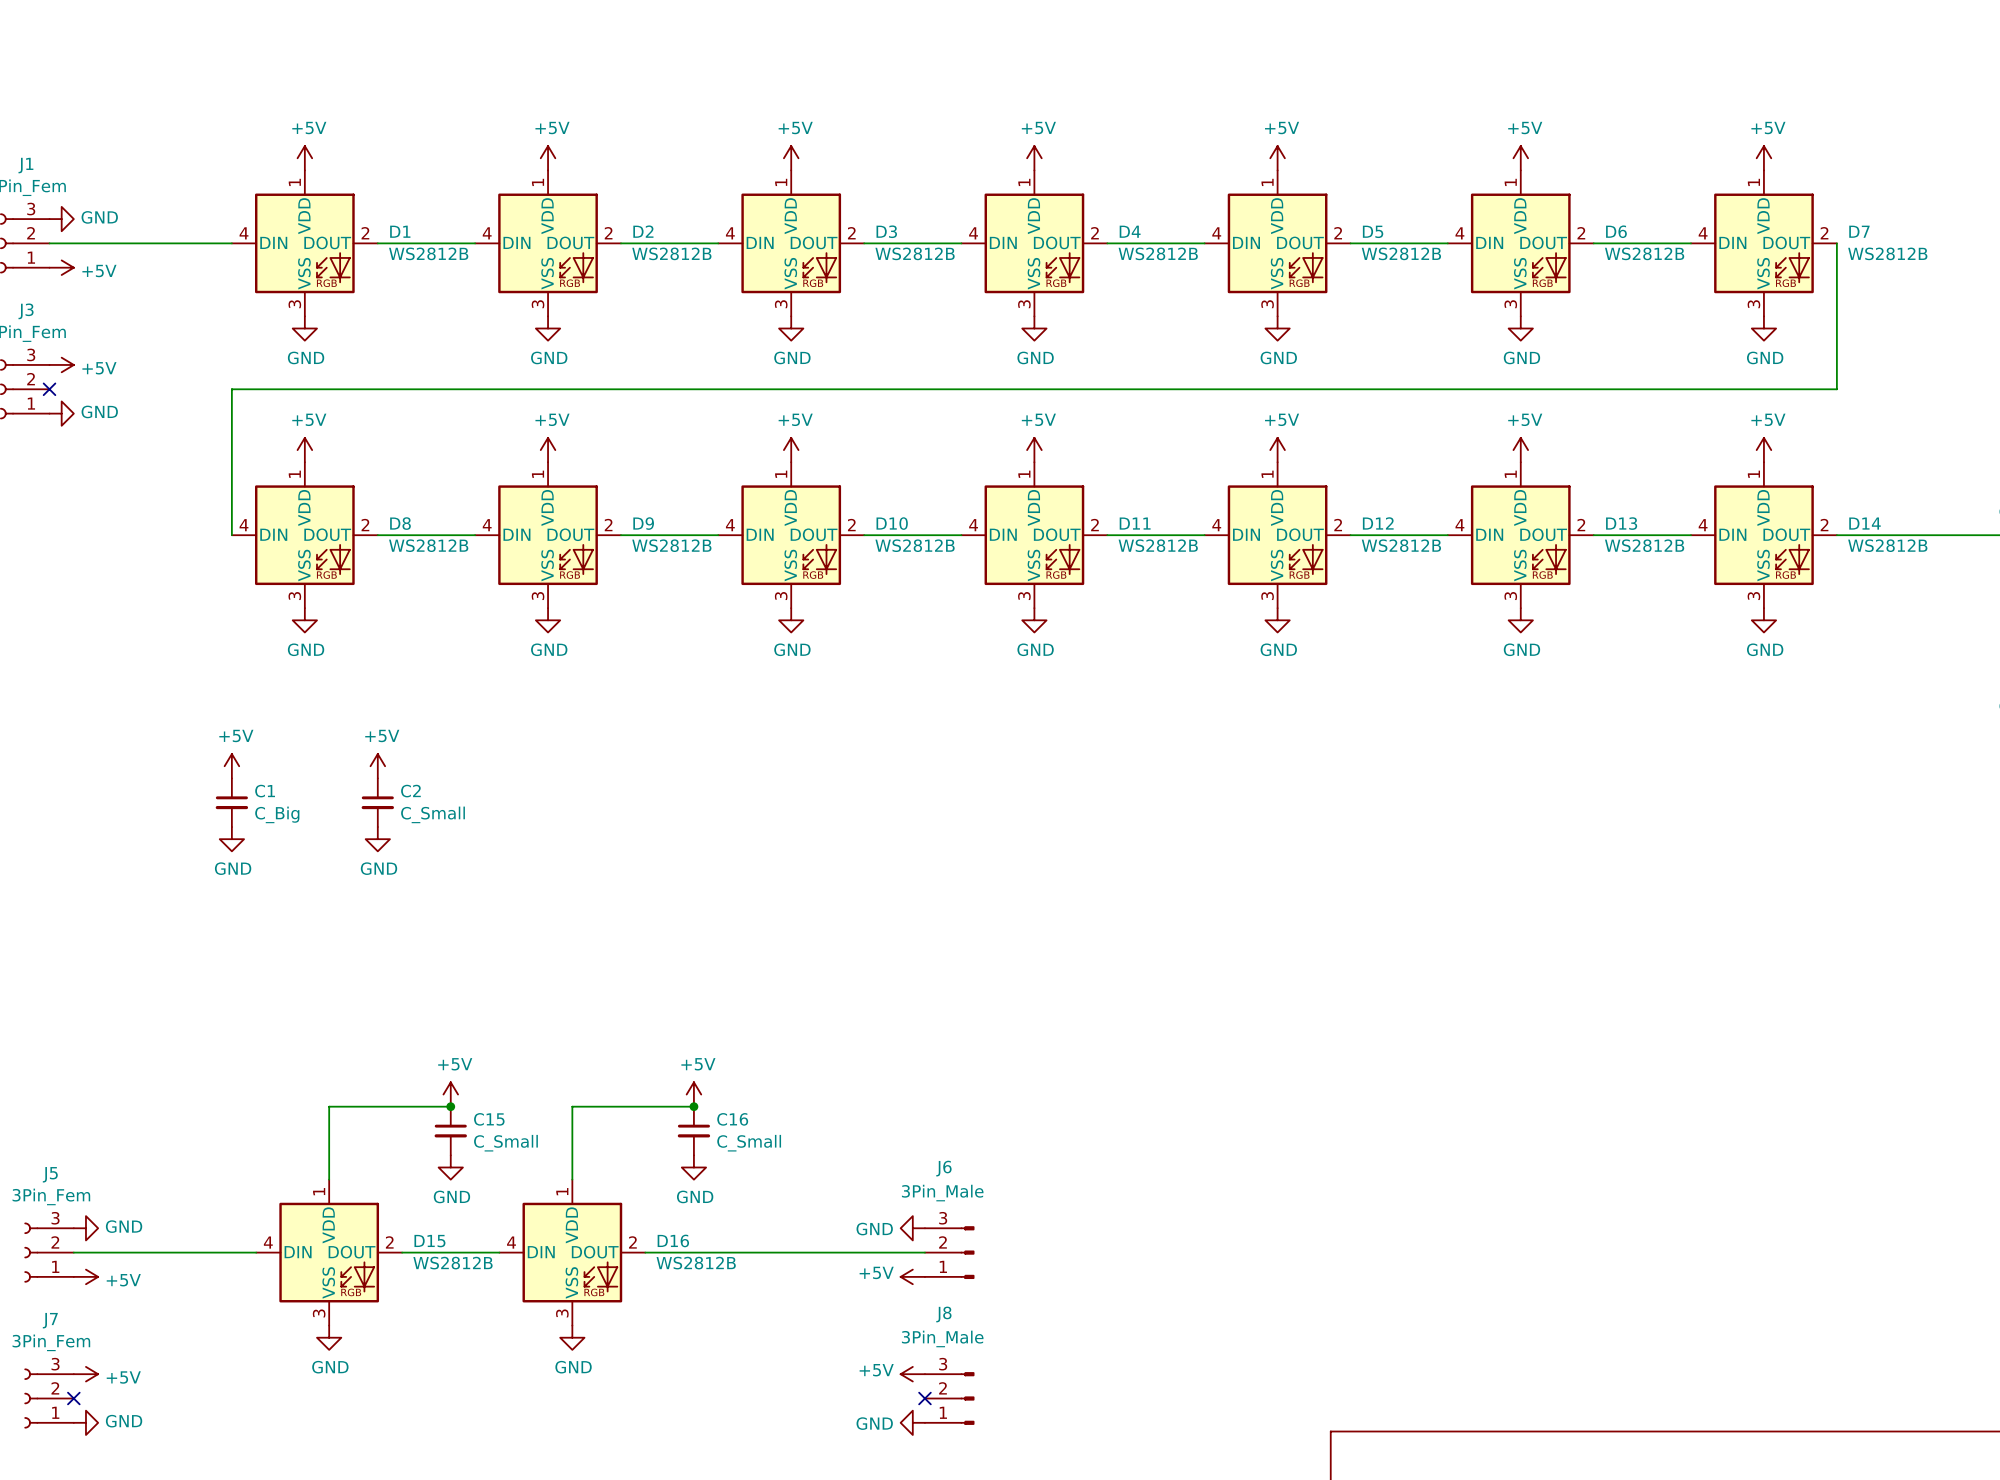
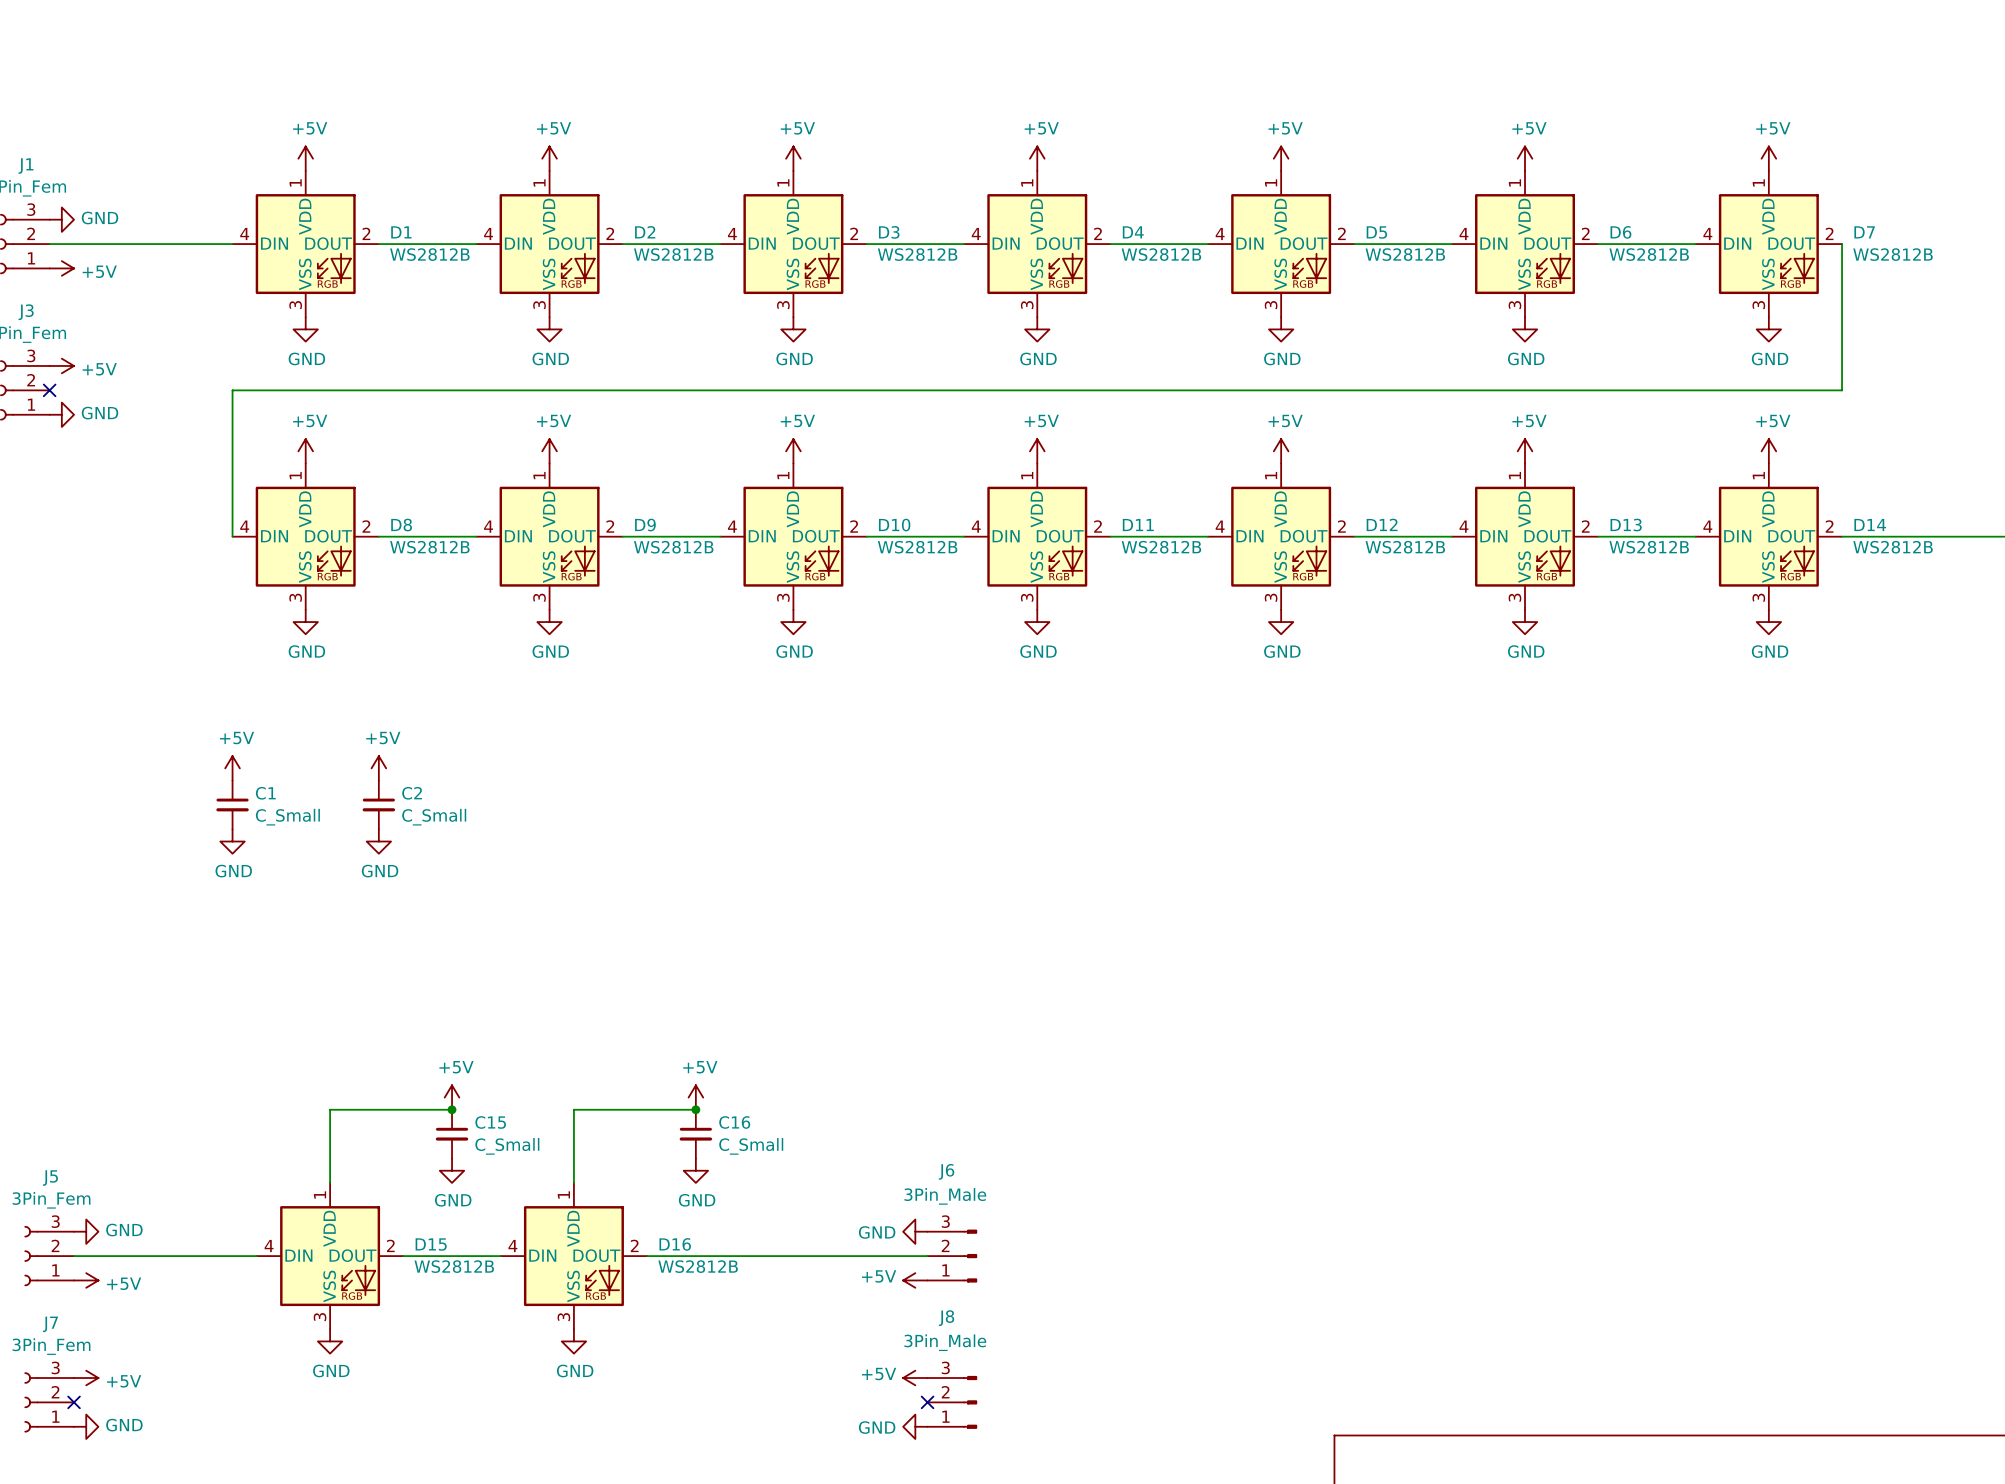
C1 value: C_Big (277, 814) -> C_Small (287, 817)

